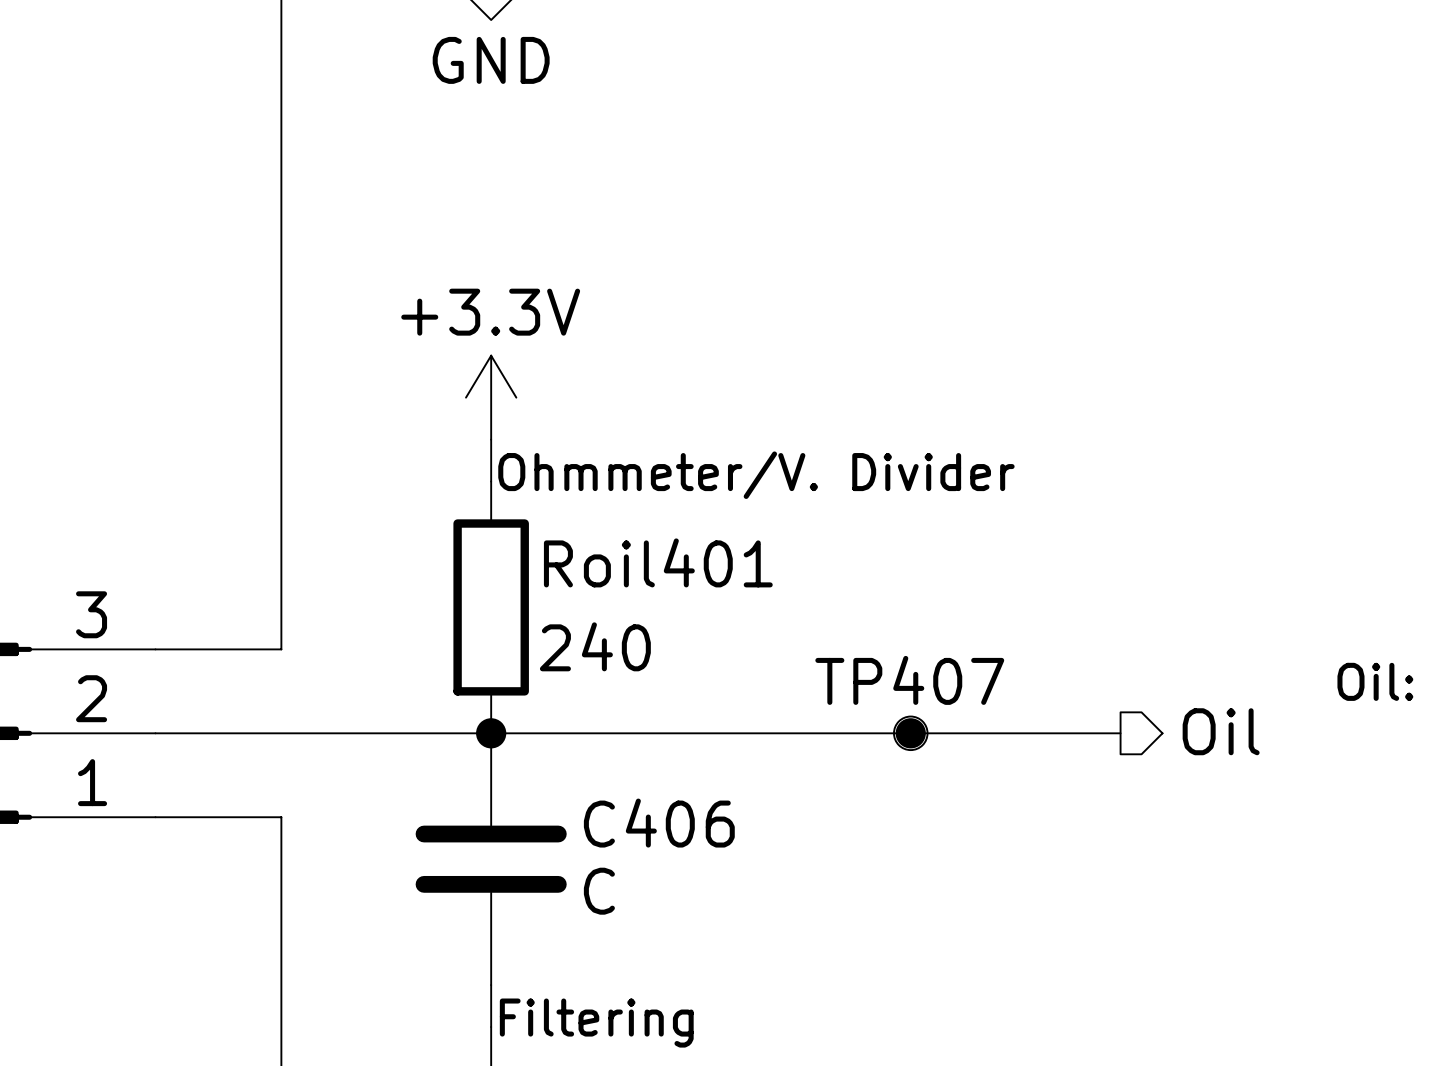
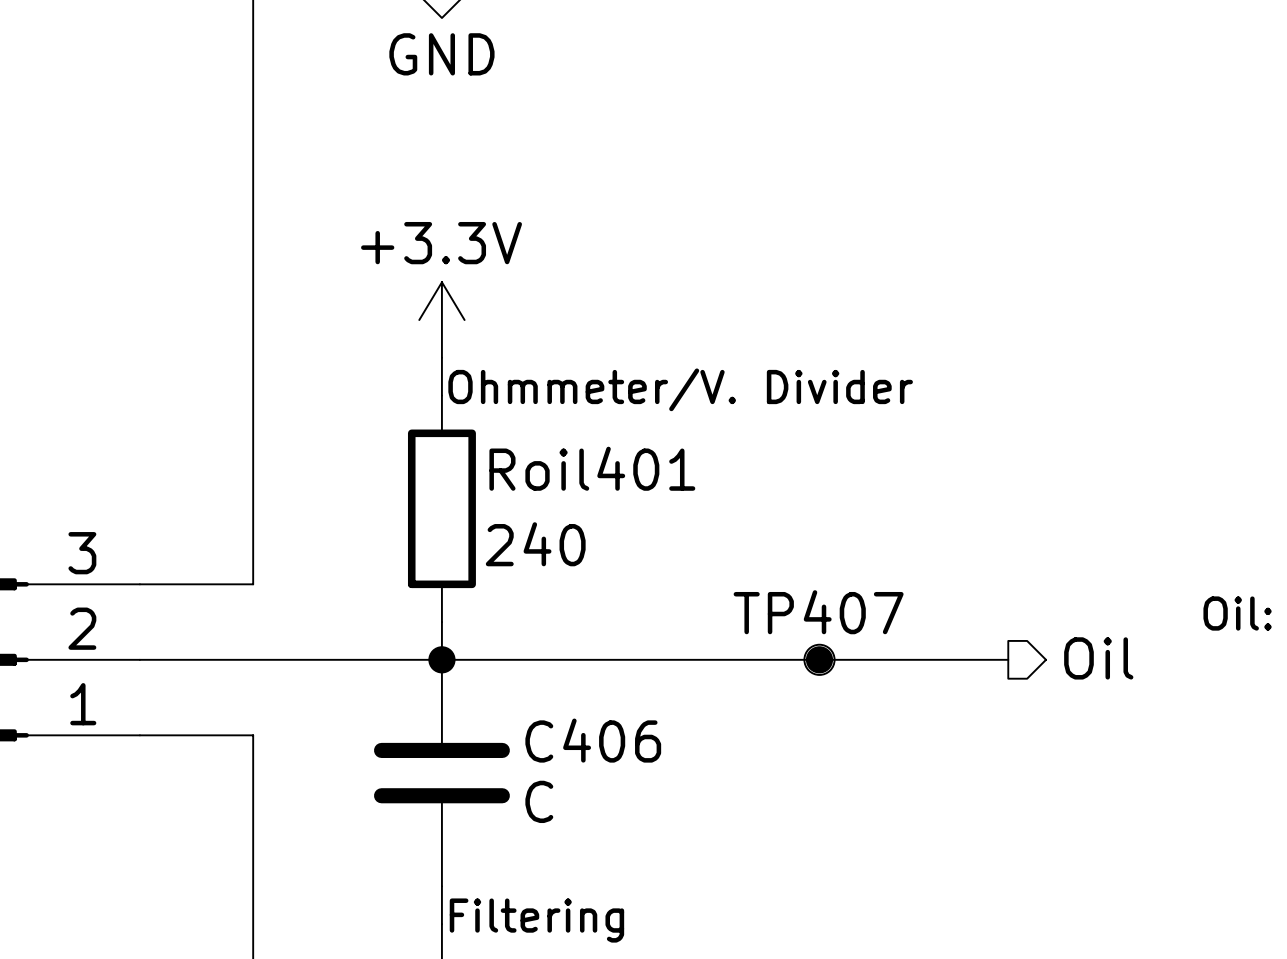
power symbol position: +3.3V (491, 397) -> +3.3V (441, 320)
text position: Ohmmeter/V. Divider (756, 475) -> Ohmmeter/V. Divider (680, 389)
Roil401 position: (491, 607) -> (441, 508)

